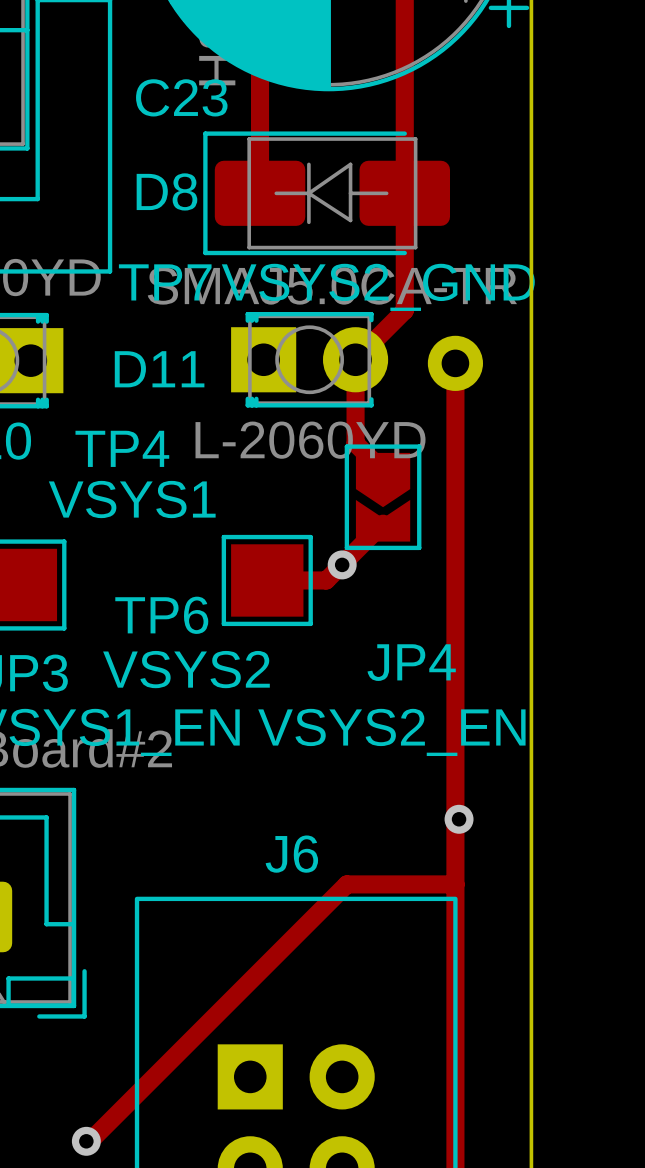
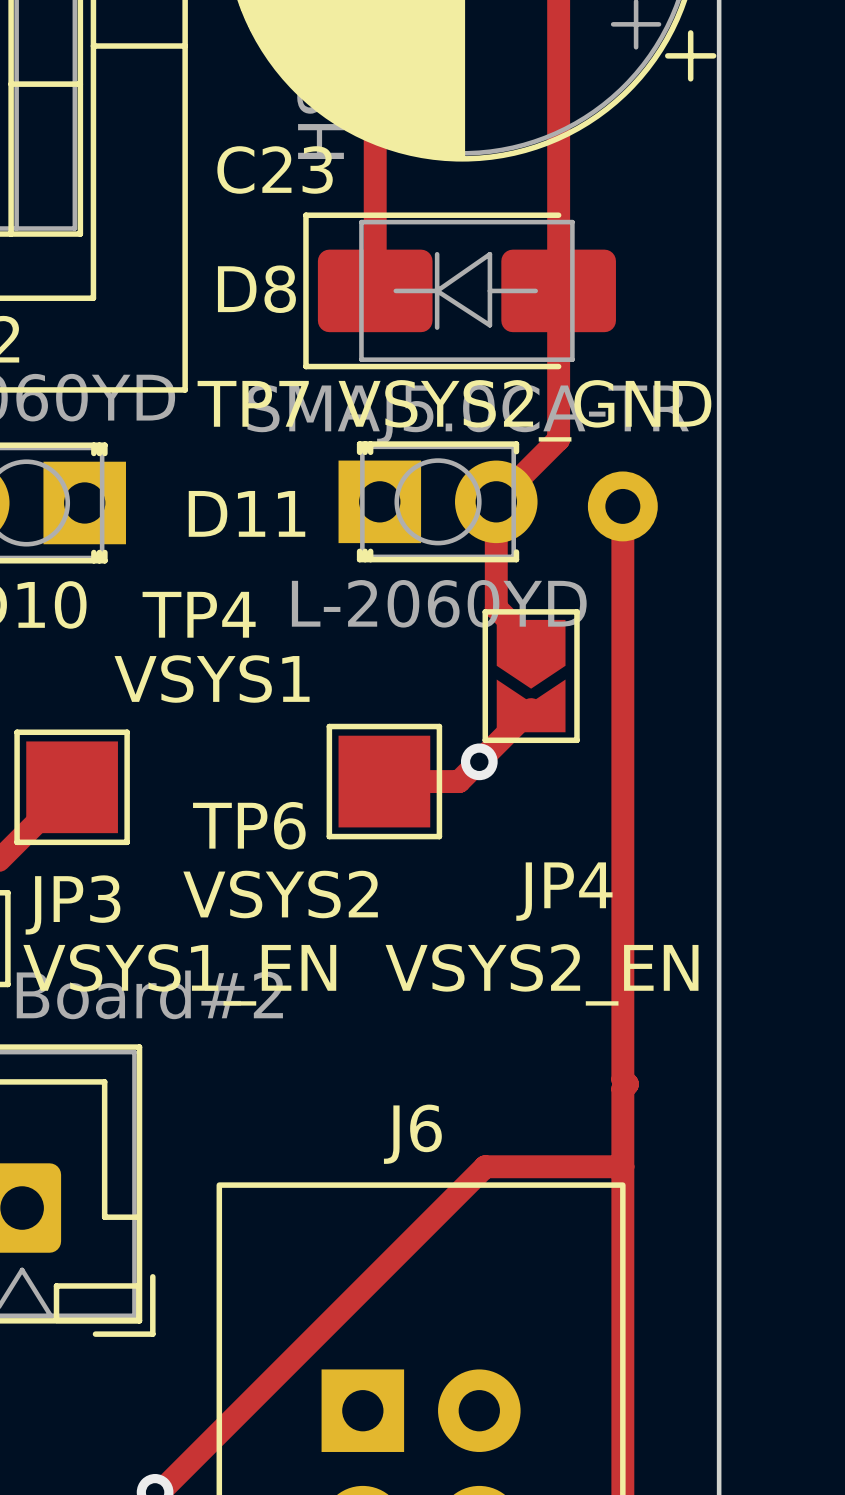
via: (459, 819) -> none

